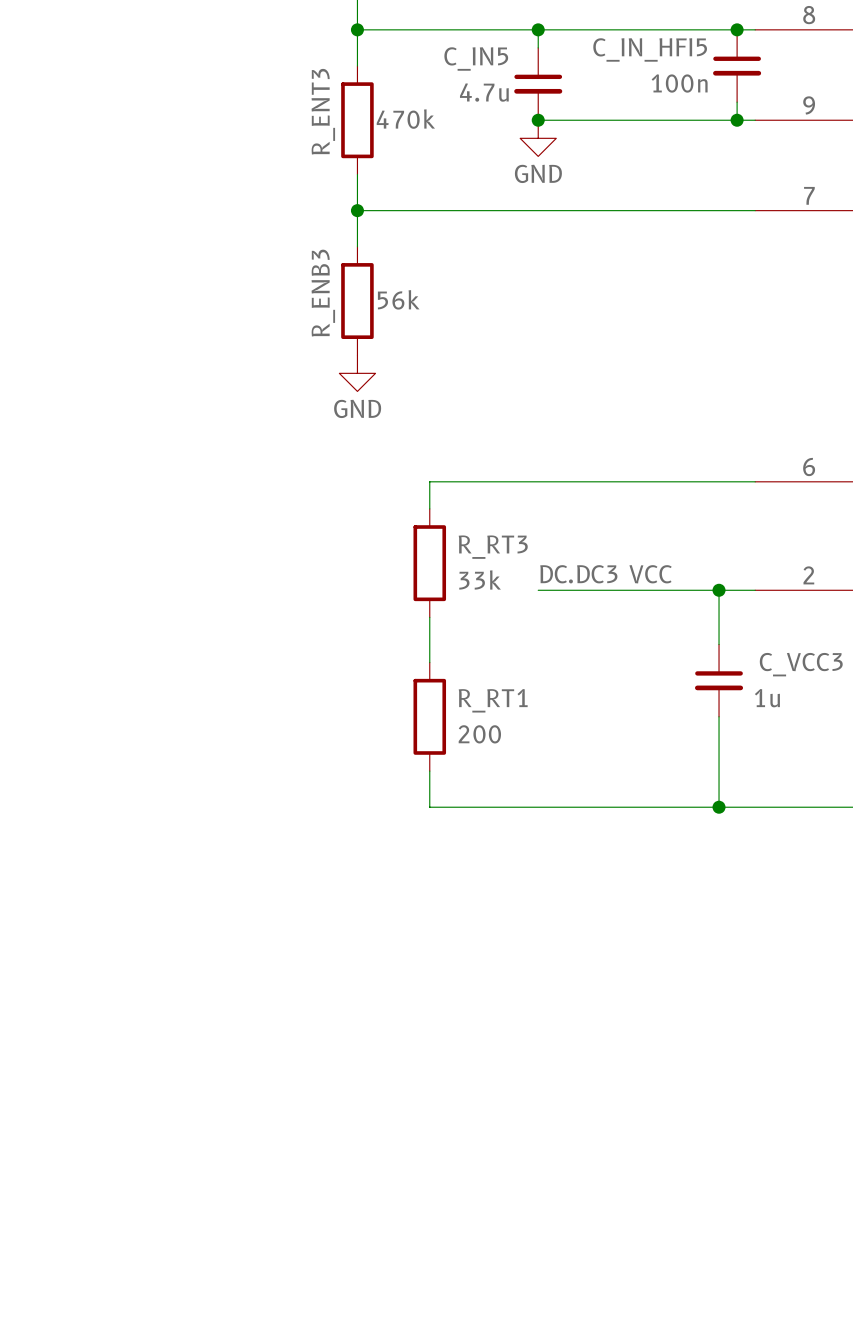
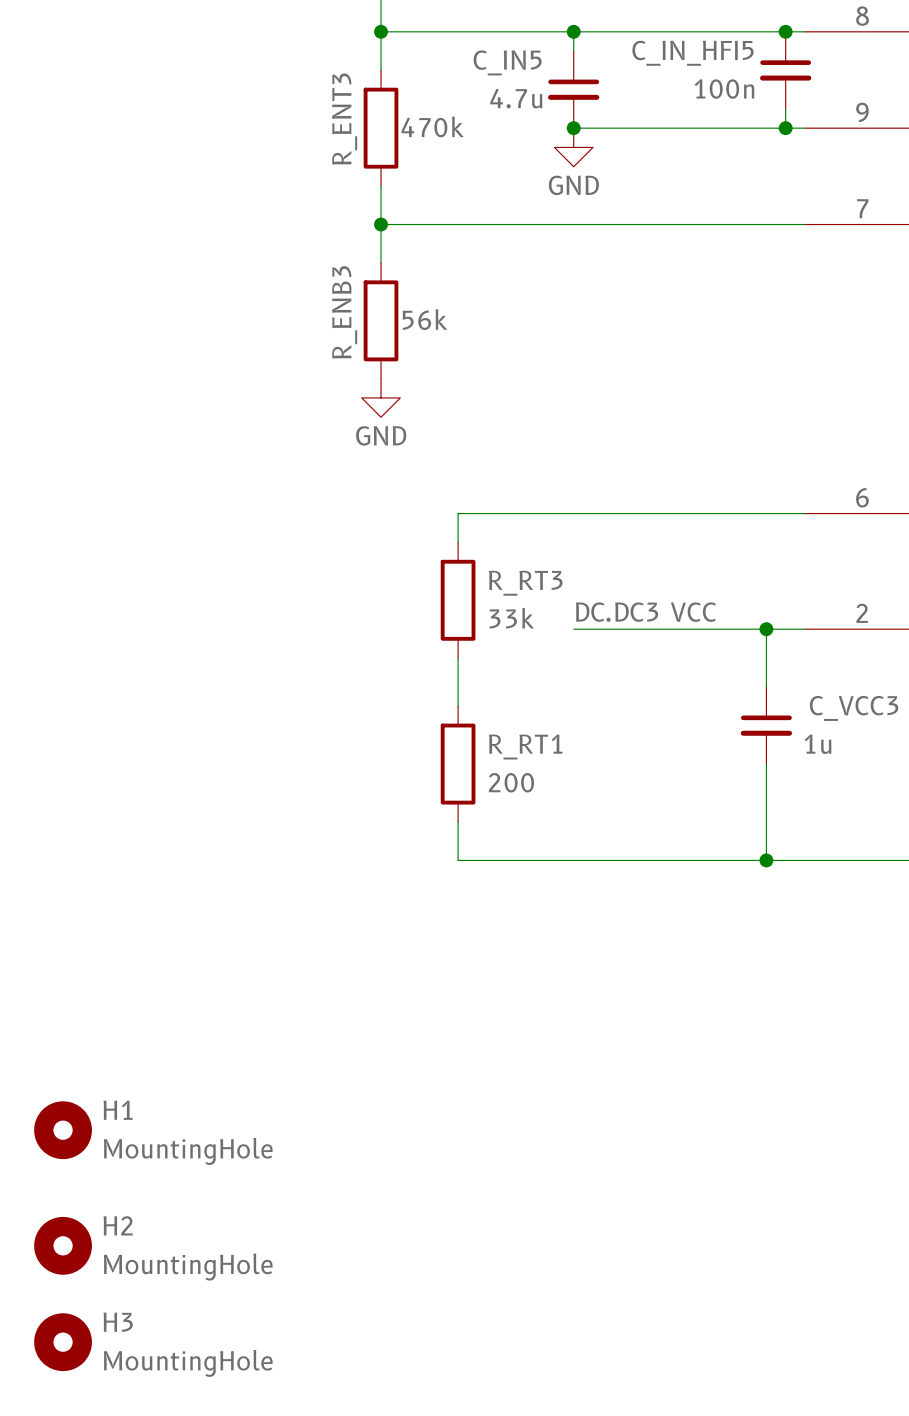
H1: none -> MountingHole (63, 1130)
H2: none -> MountingHole (63, 1245)
H3: none -> MountingHole (63, 1342)

